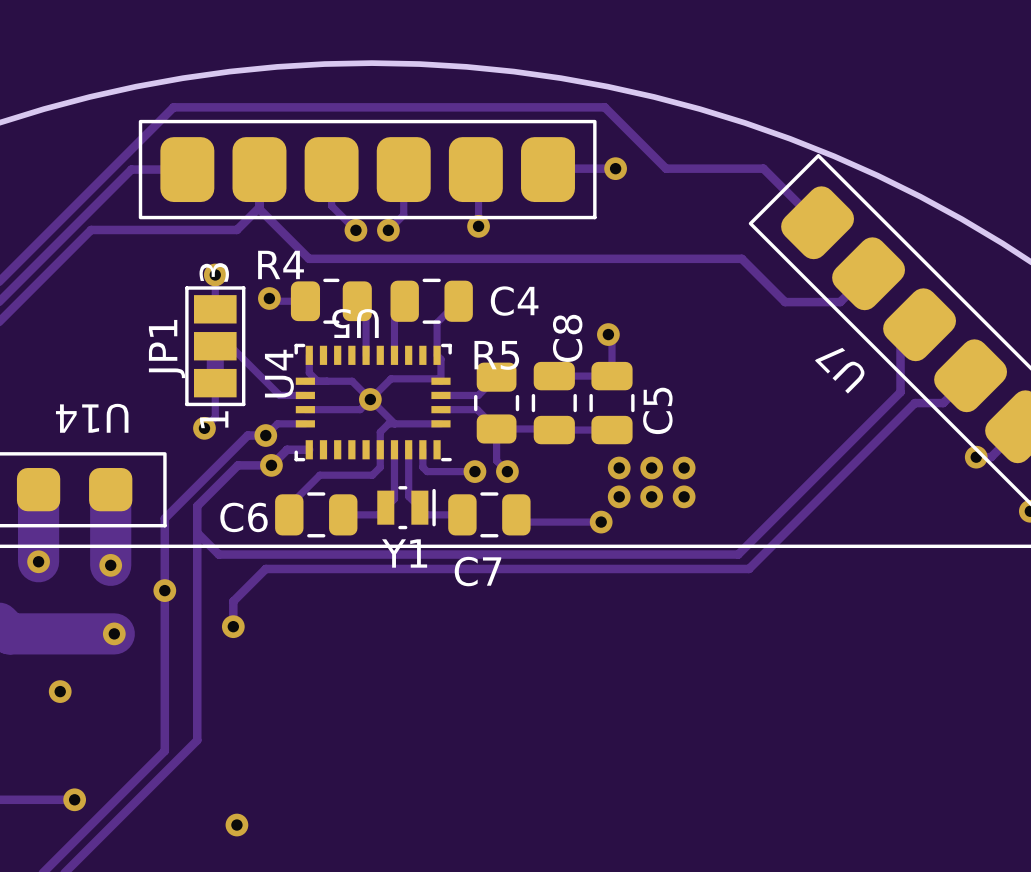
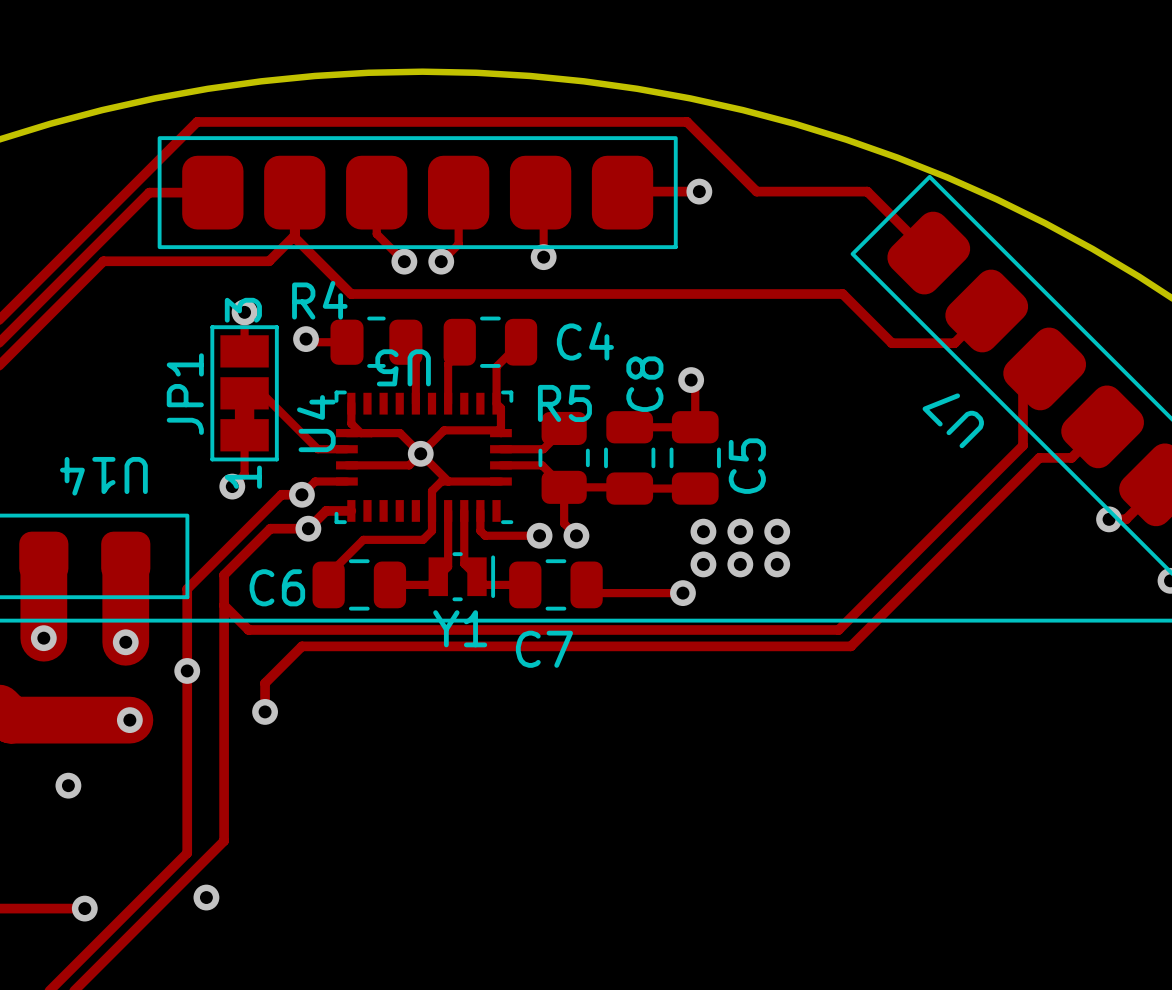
via position: (236, 825) -> (206, 897)

